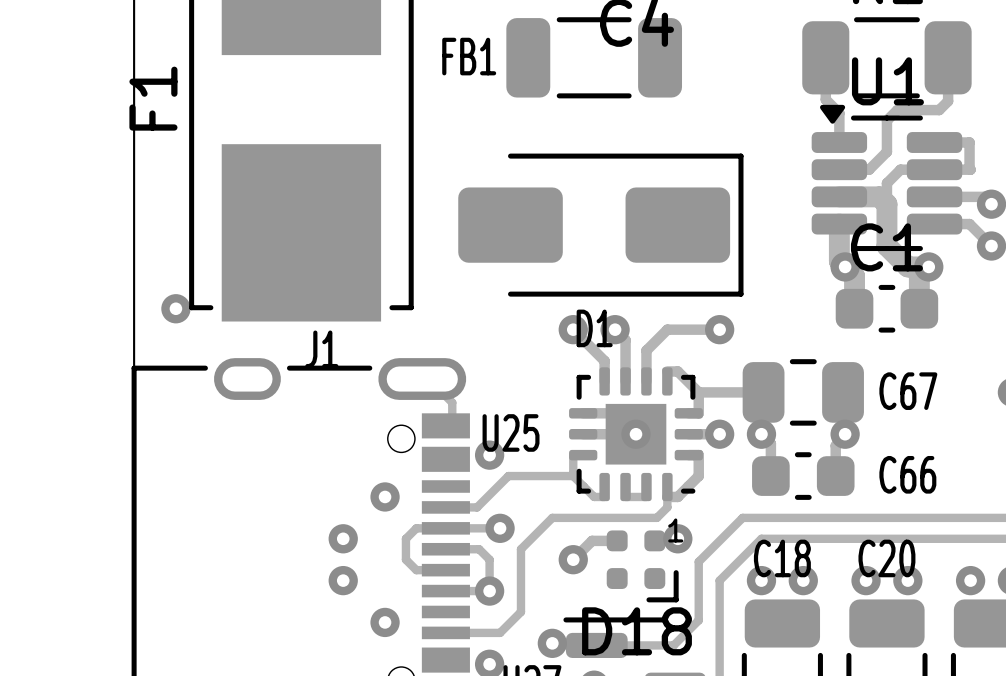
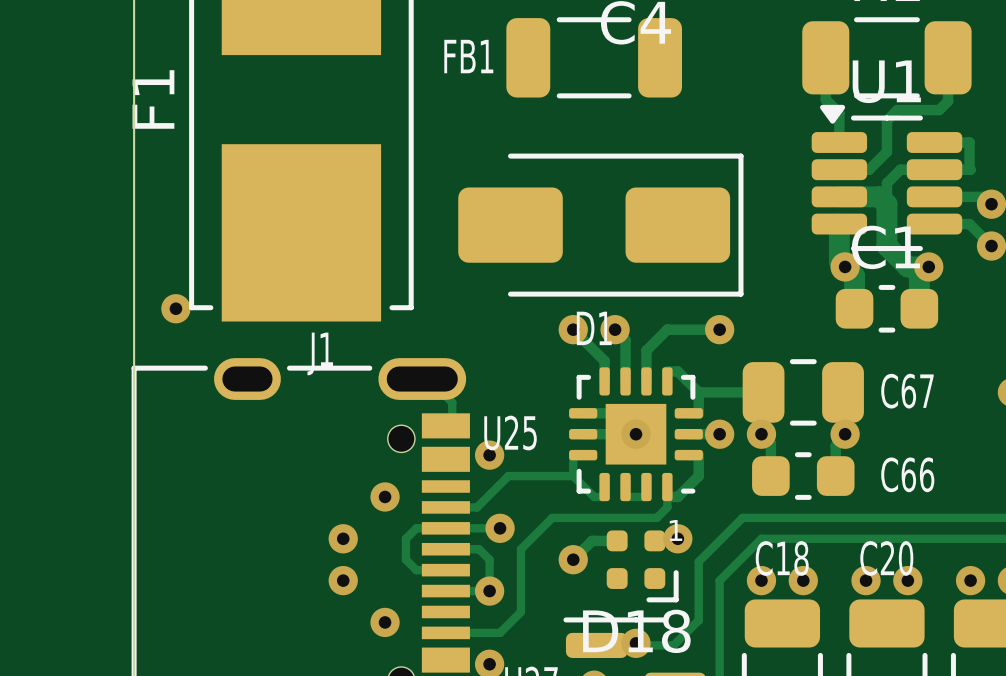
via: (552, 643) -> none
via: none -> (636, 643)

